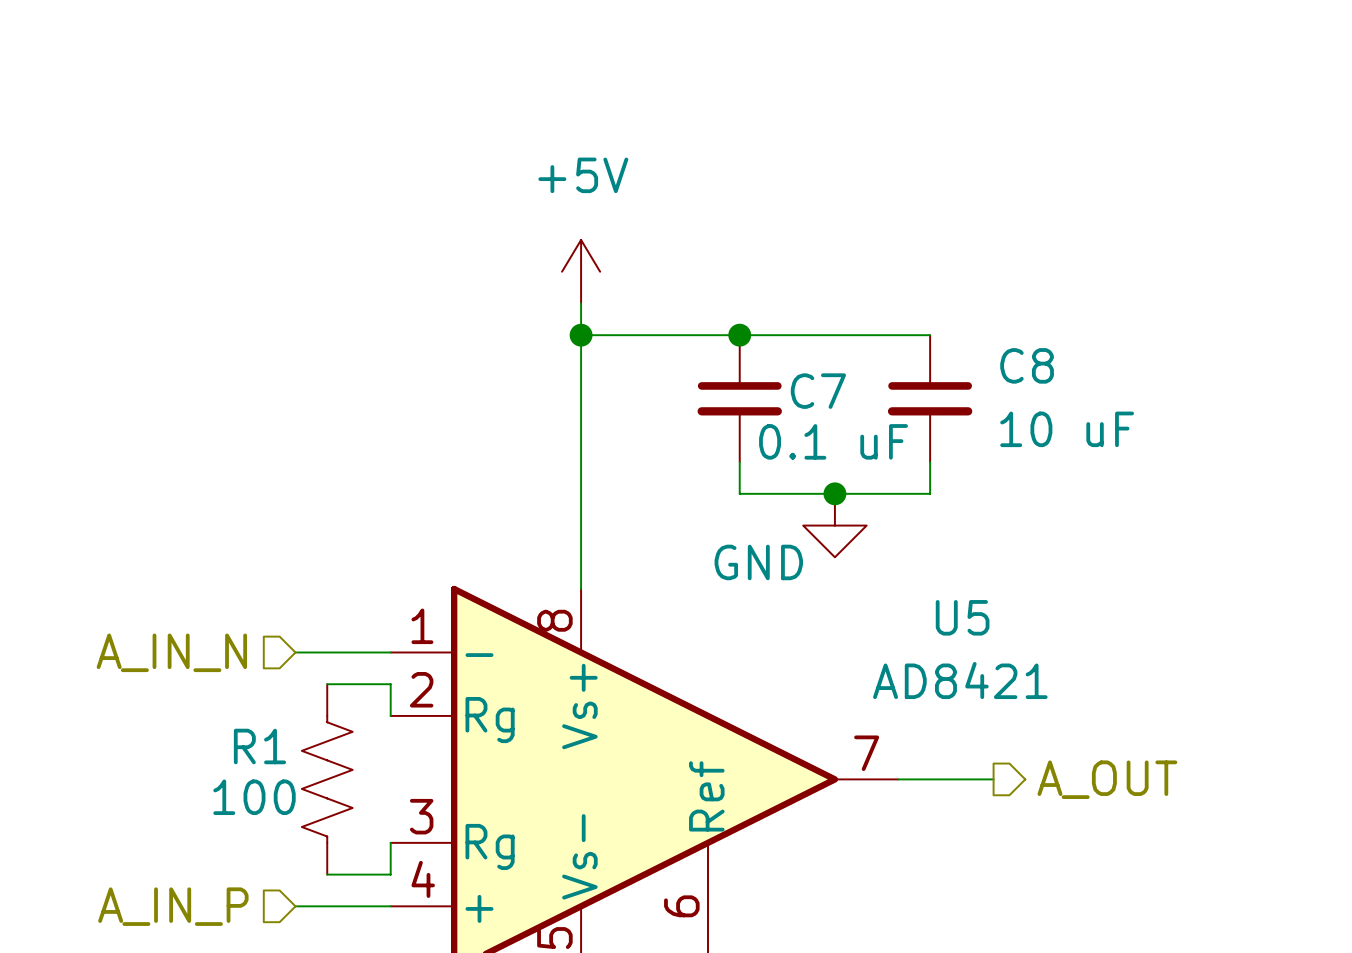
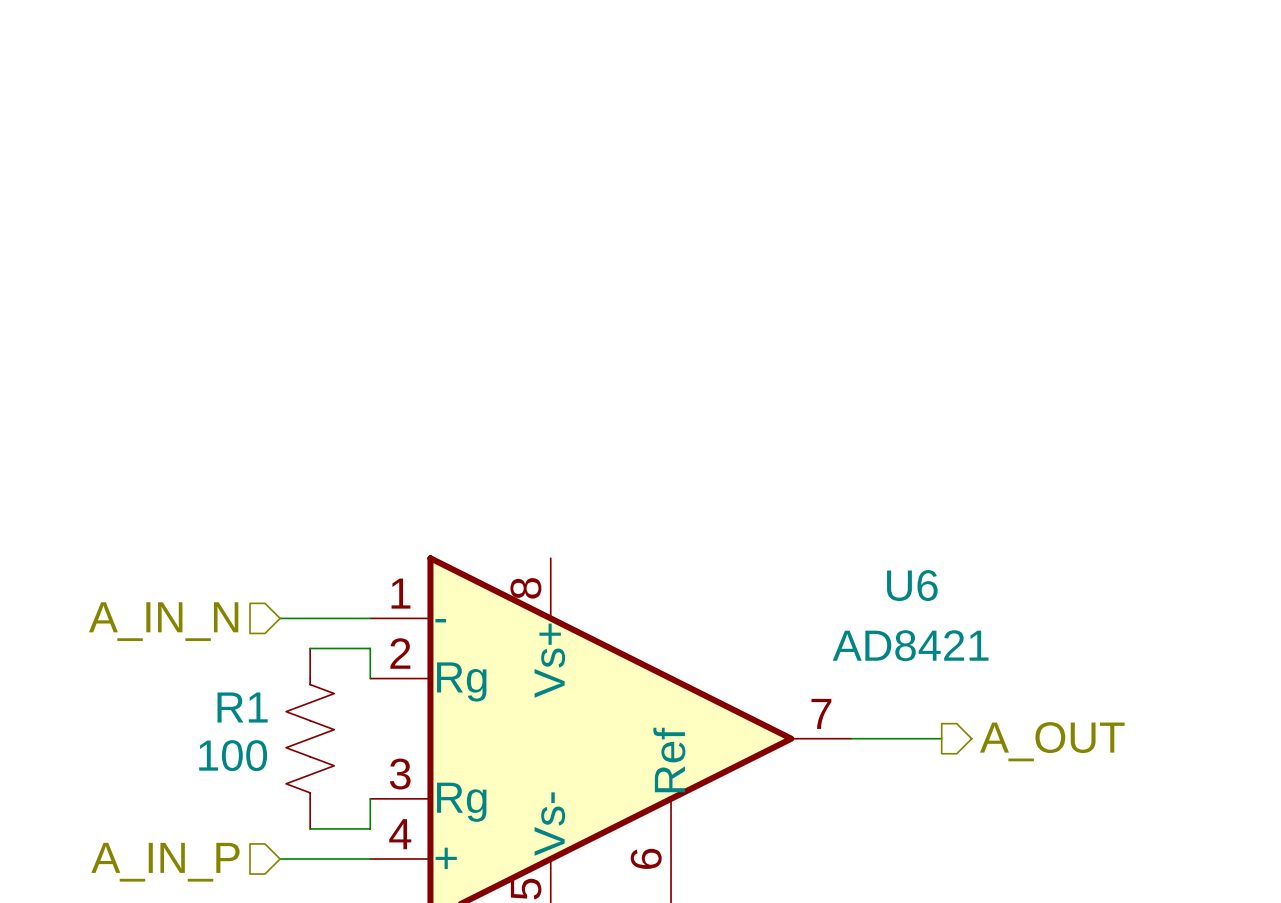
power symbol: +5V (581, 271) -> none
wire: (581, 303) (581, 589) -> none
wire: (581, 335) (930, 335) -> none
junction: (581, 335) -> none
junction: (739, 335) -> none
C7: 0.1 uF (739, 398) -> none
C8: 10 uF (930, 398) -> none
wire: (739, 462) (739, 493) (930, 493) (930, 462) -> none
junction: (834, 493) -> none
power symbol: GND (834, 525) -> none
U5 name: U5 (962, 617) -> U6 (912, 585)

